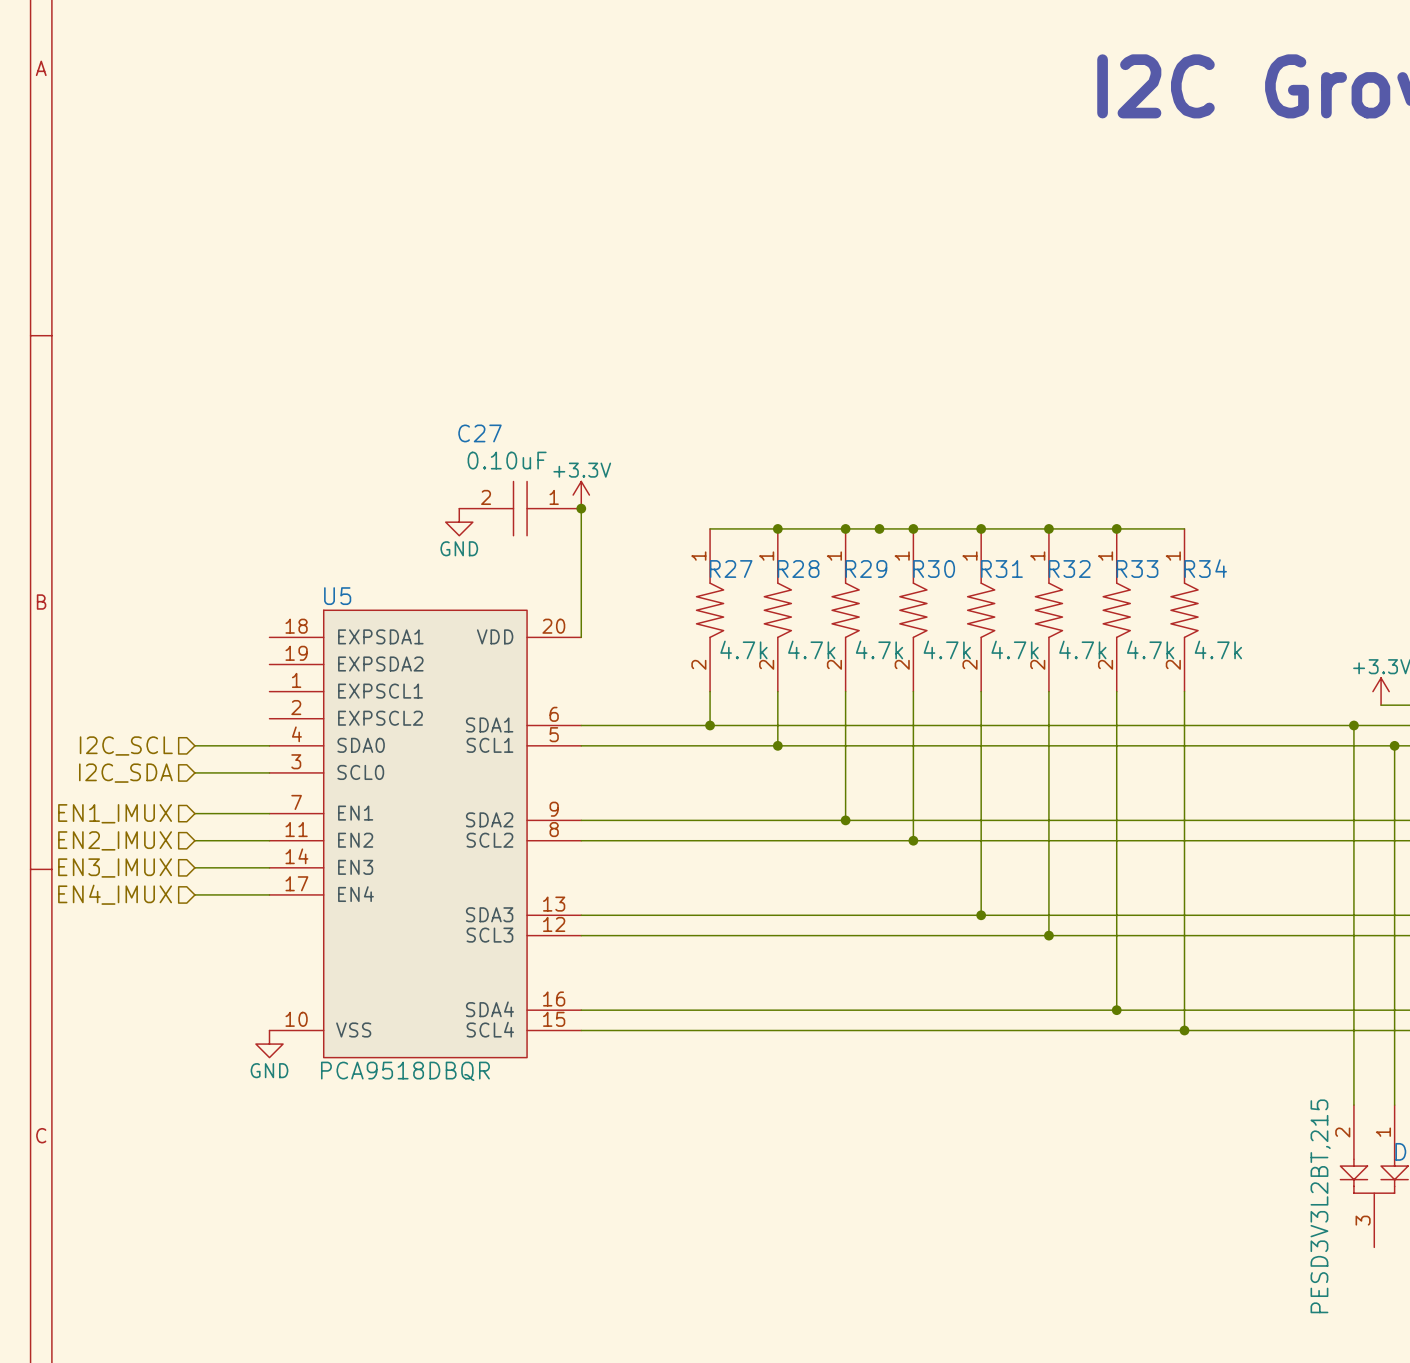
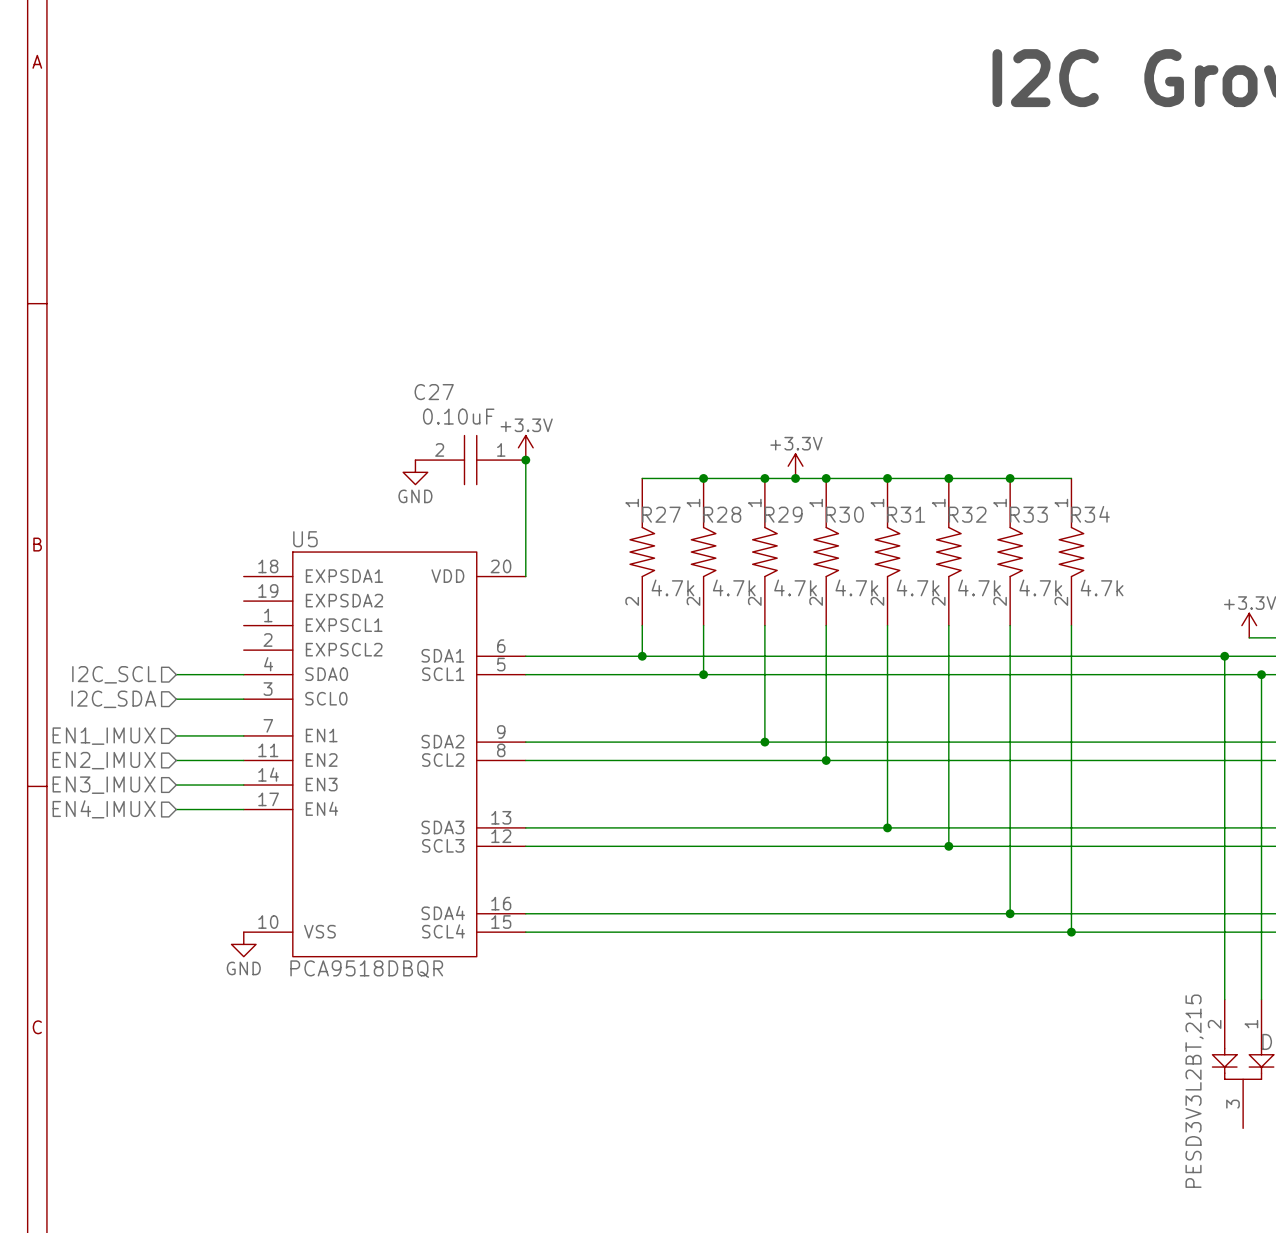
power symbol: none -> +3.3V (795, 466)

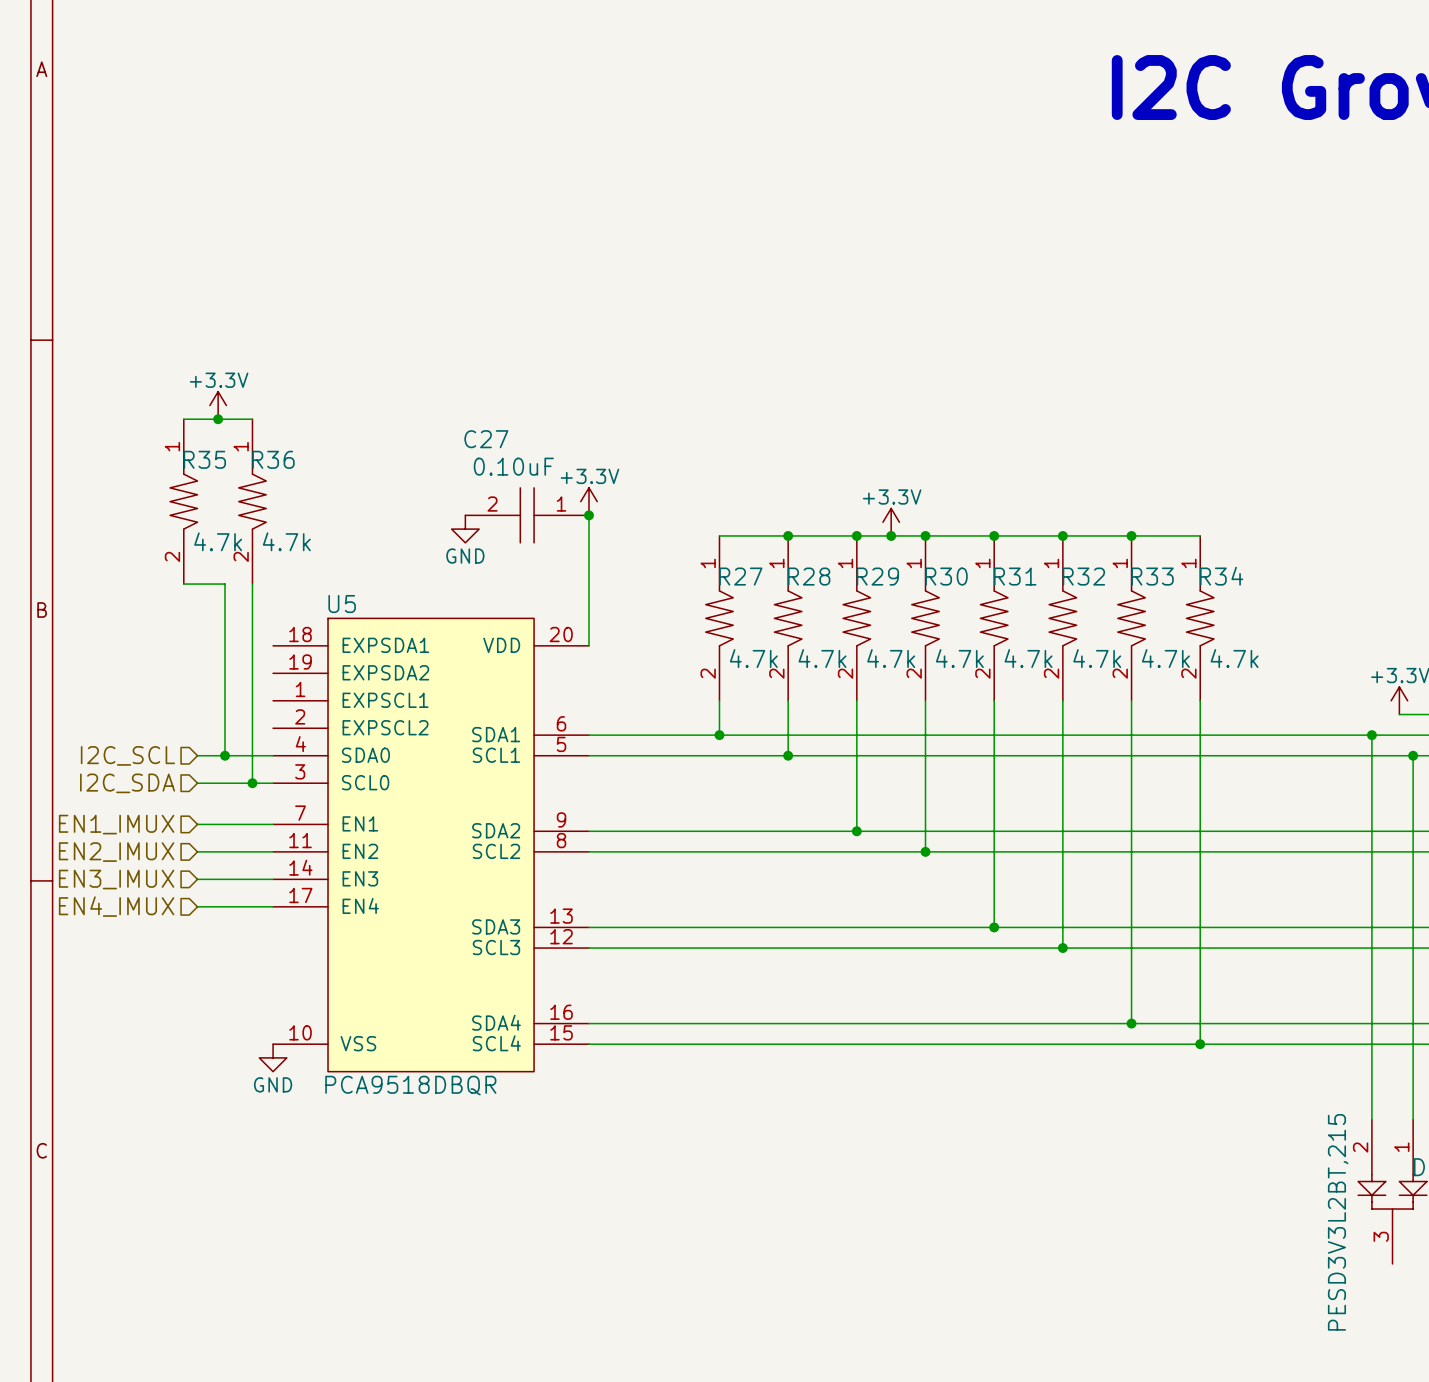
power symbol: none -> +3.3V (218, 405)
wire: none -> (183, 419) (252, 419)
junction: none -> (218, 419)
R35: none -> (183, 501)
R36: none -> (252, 501)
wire: none -> (183, 584) (224, 584) (224, 755)
wire: none -> (252, 584) (252, 783)
junction: none -> (224, 755)
junction: none -> (252, 783)

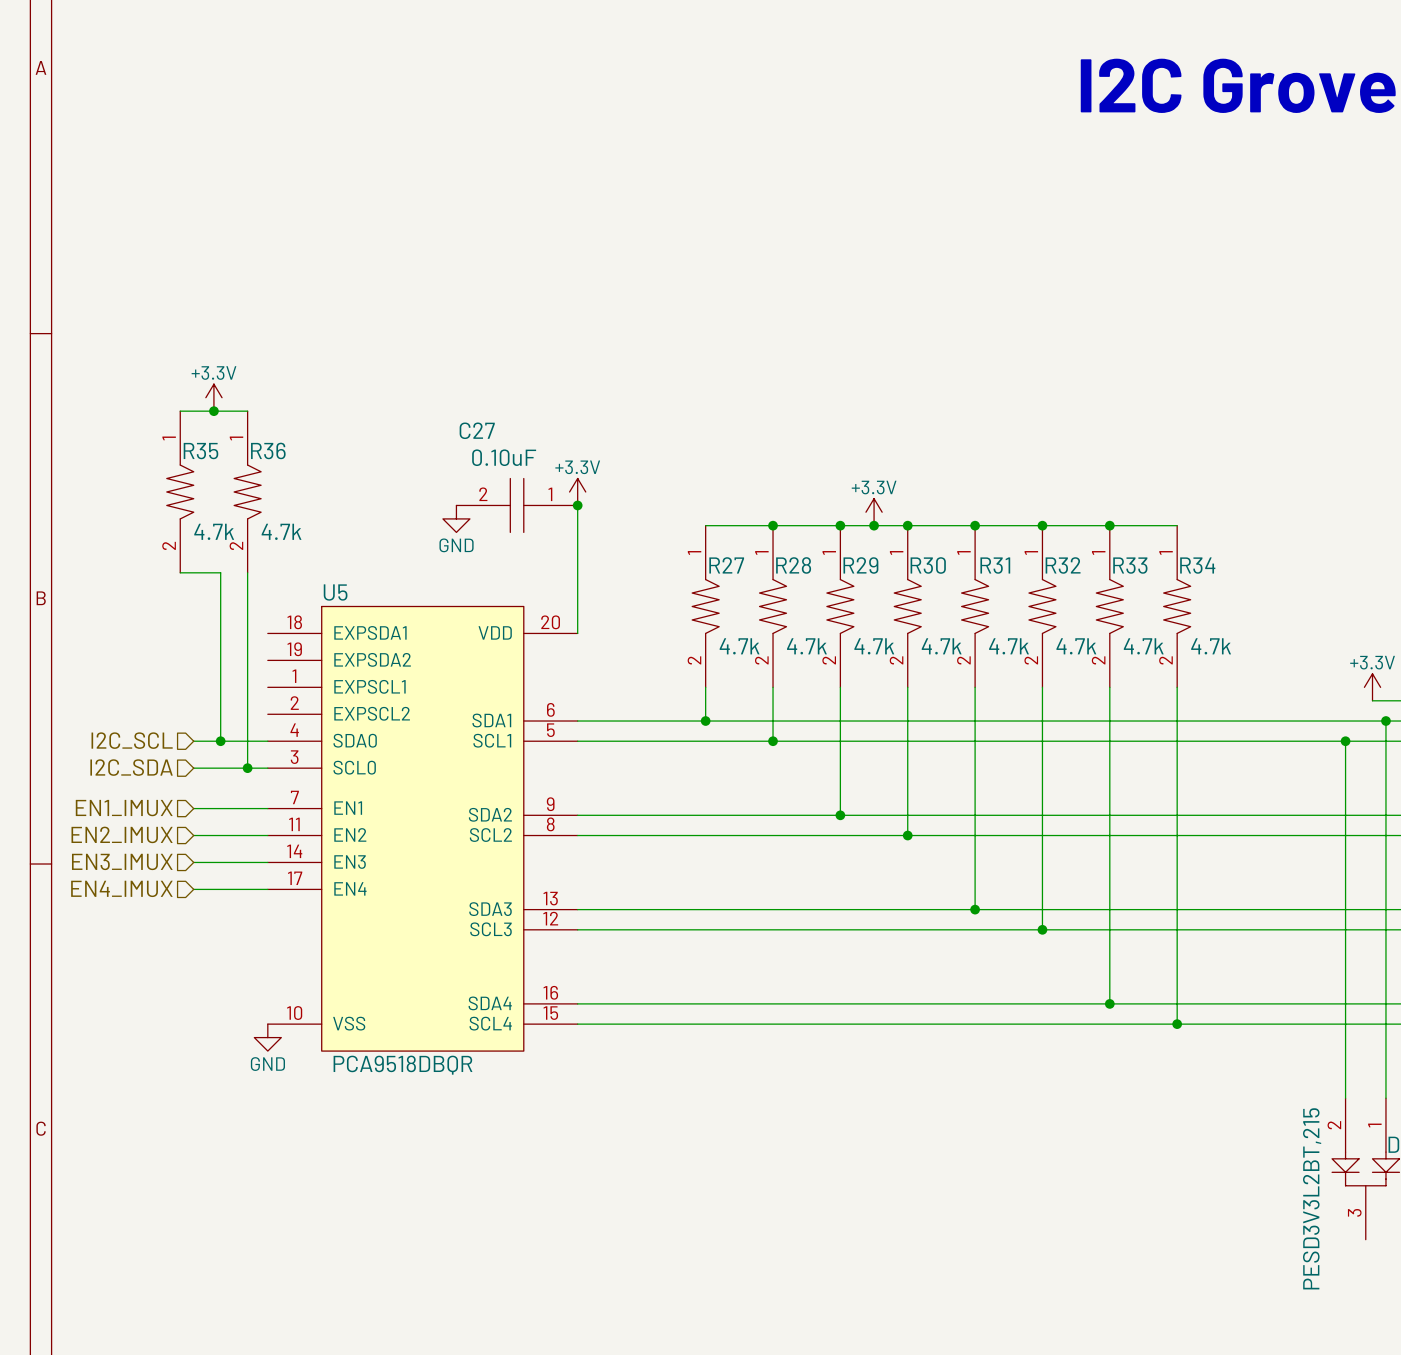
wire: (1371, 735) (1371, 755) -> (1385, 721) (1385, 741)
junction: (1371, 735) -> none
junction: none -> (1385, 721)
junction: none -> (1345, 741)
junction: (1413, 755) -> none

